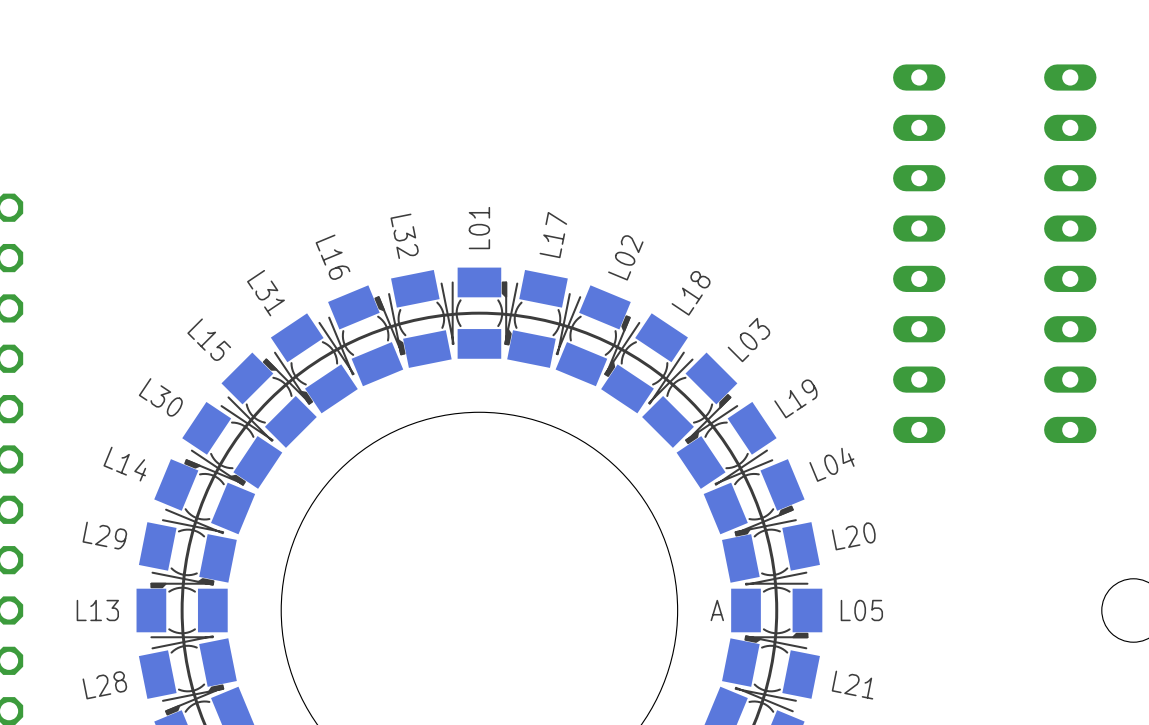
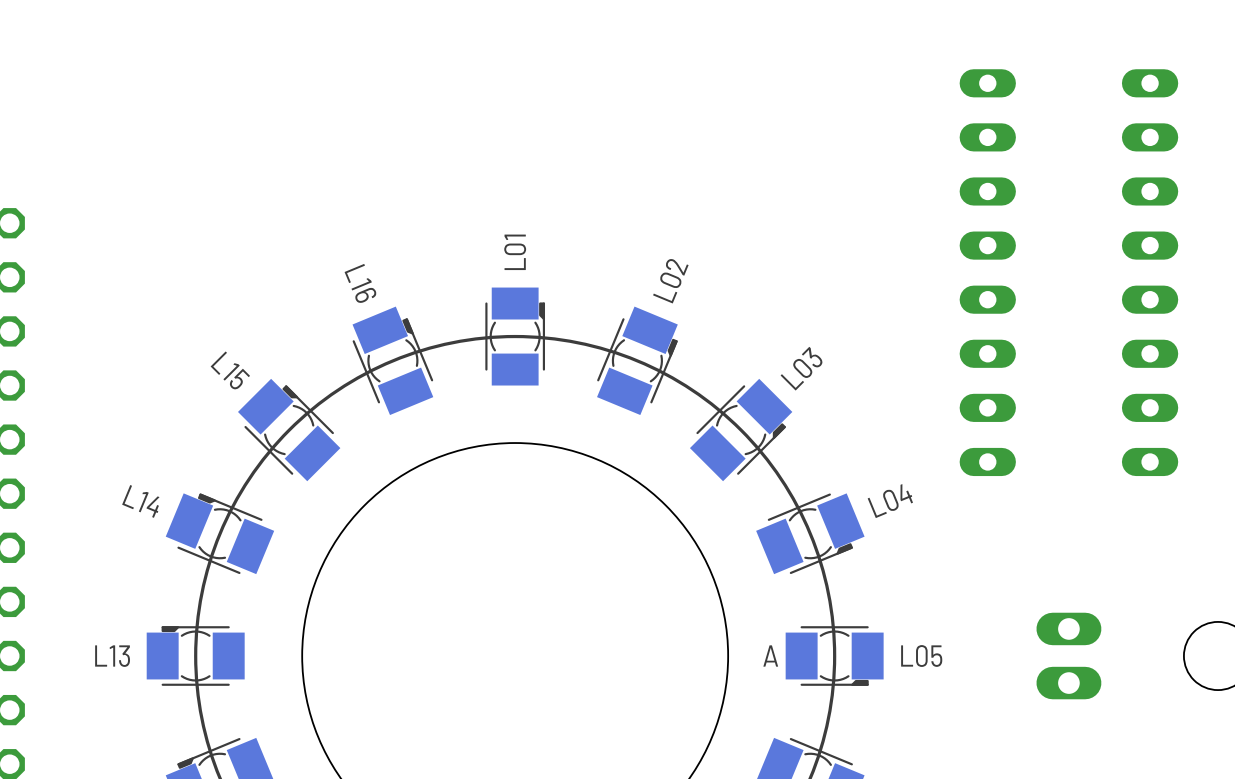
L32: (421, 318) -> none
L17: (537, 318) -> none
L31: (314, 363) -> none
L18: (644, 363) -> none
L30: (232, 445) -> none
L19: (726, 445) -> none
L29: (187, 552) -> none
L20: (770, 552) -> none
part: none -> (1068, 656)
L28: (187, 668) -> none
L21: (770, 668) -> none

